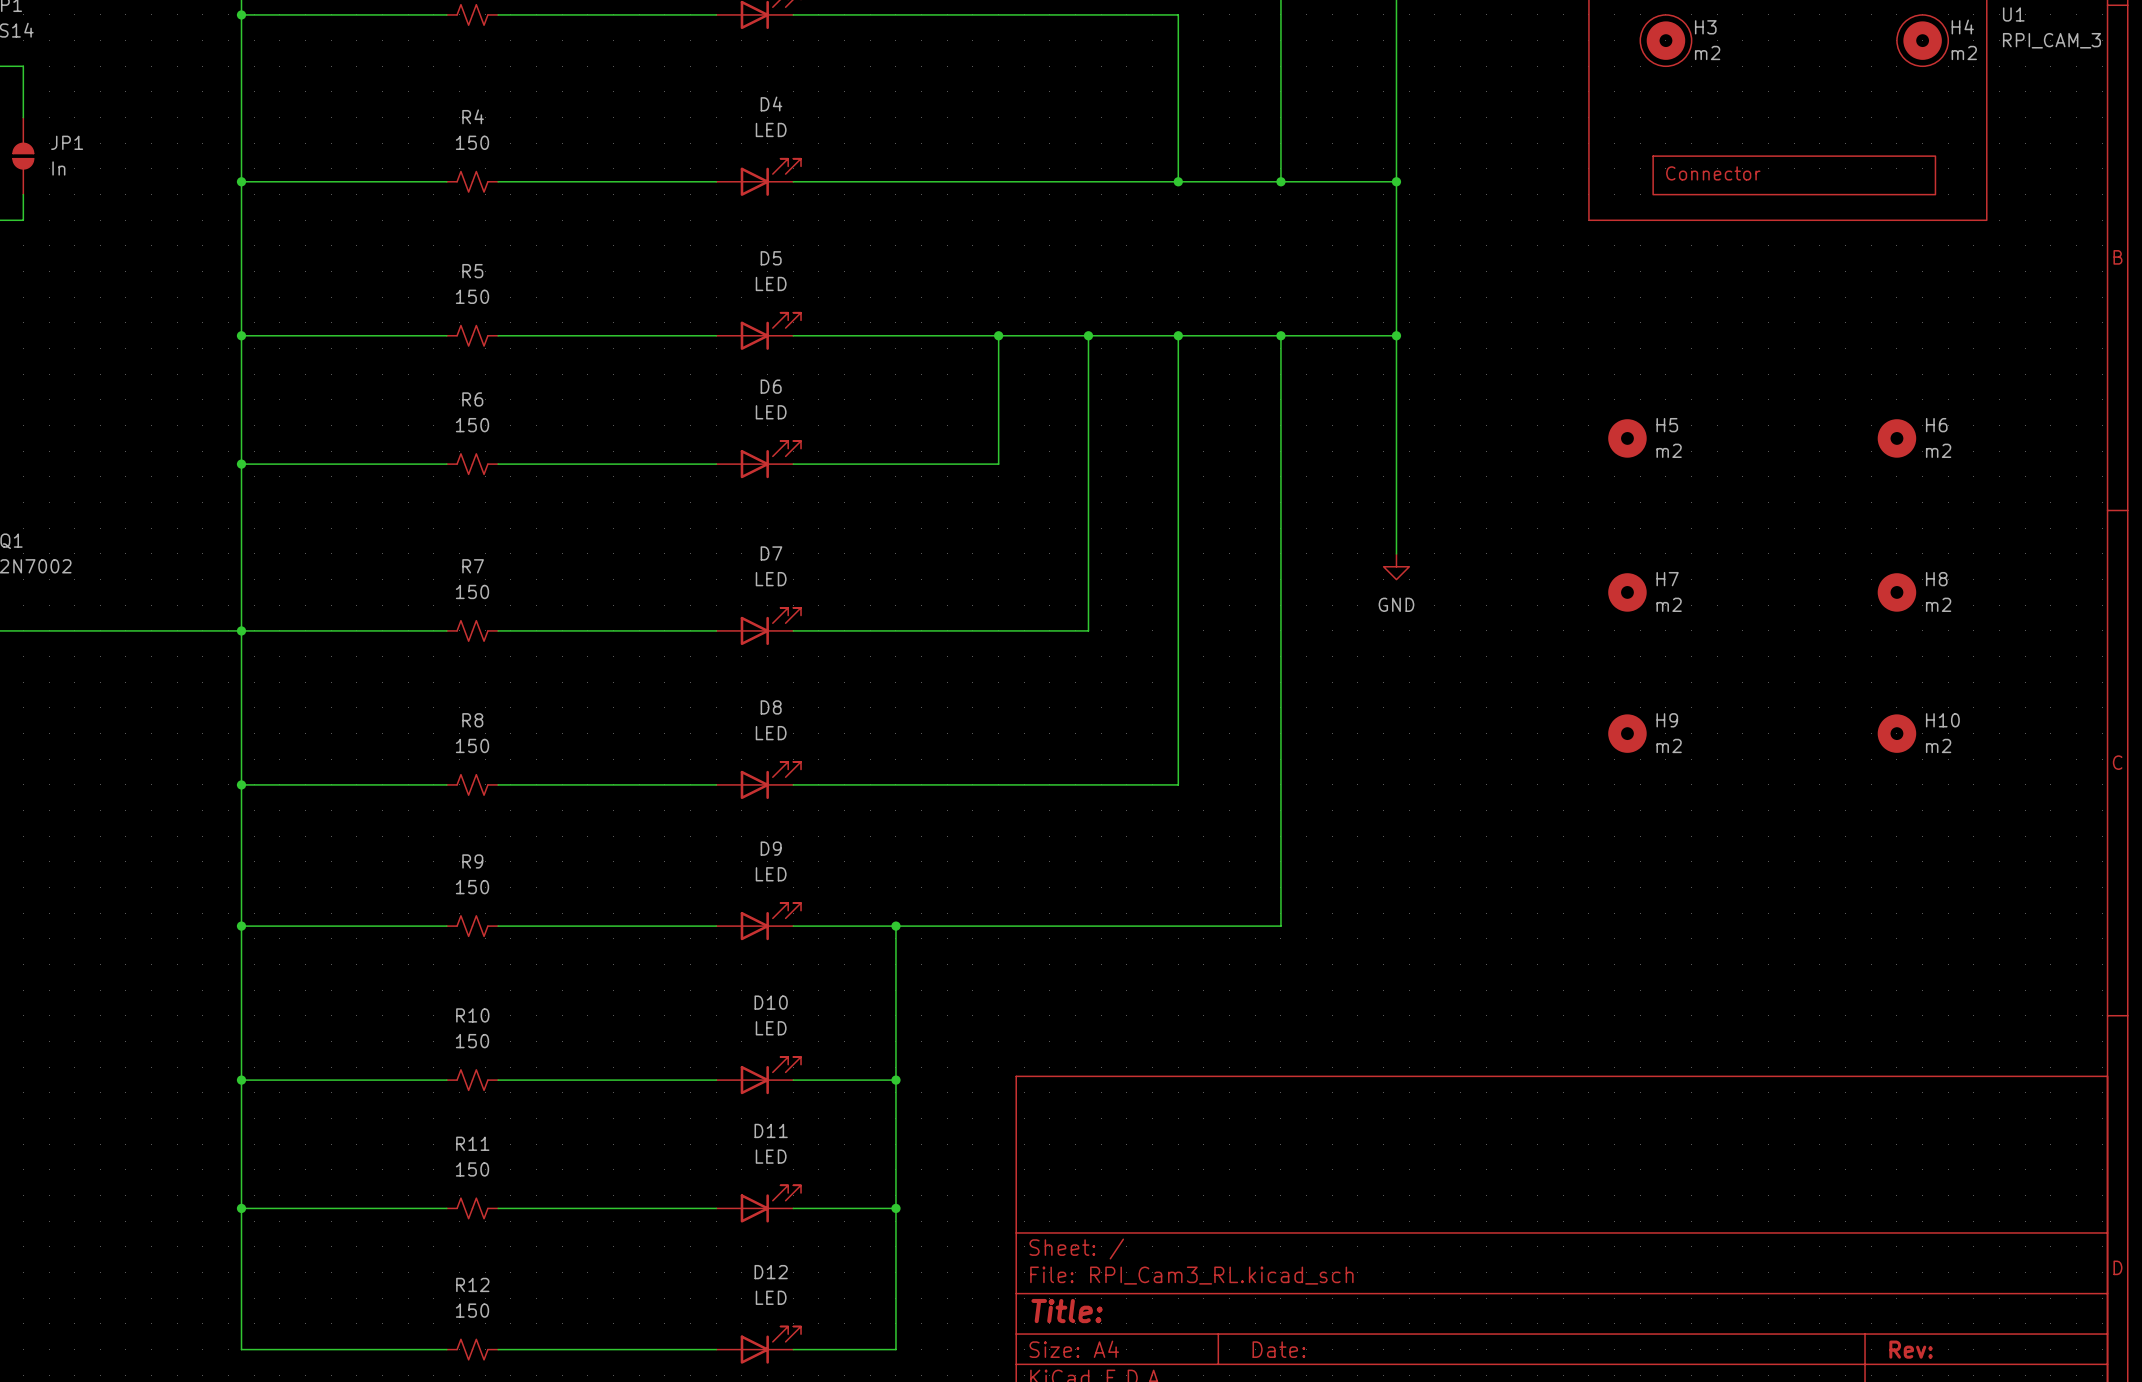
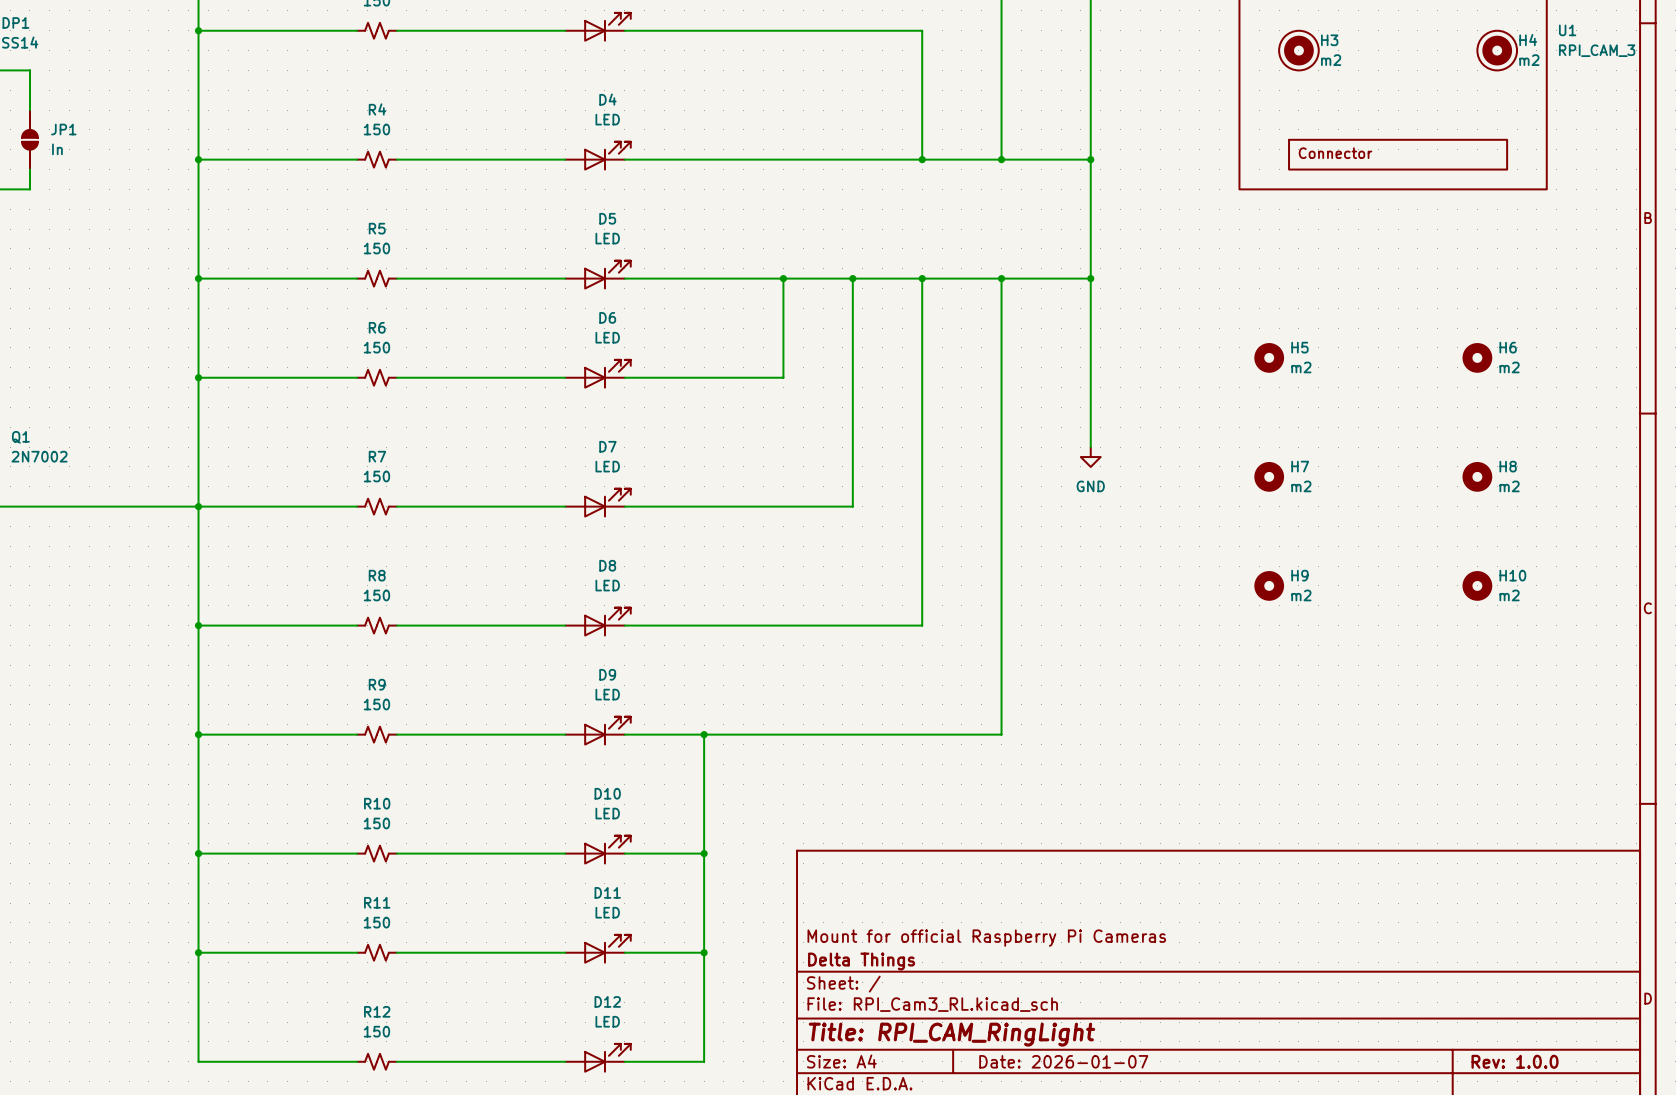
title block: none -> Mount for official Raspberry Pi Cameras (986, 938)
title block: none -> Delta Things (861, 961)
title block: Title: (1067, 1311) -> Title: RPI_CAM_RingLight (951, 1034)
title block: Date: (1278, 1349) -> Date: 2026-01-07 (1063, 1061)
title block: Rev: (1911, 1349) -> Rev: 1.0.0 (1515, 1061)

